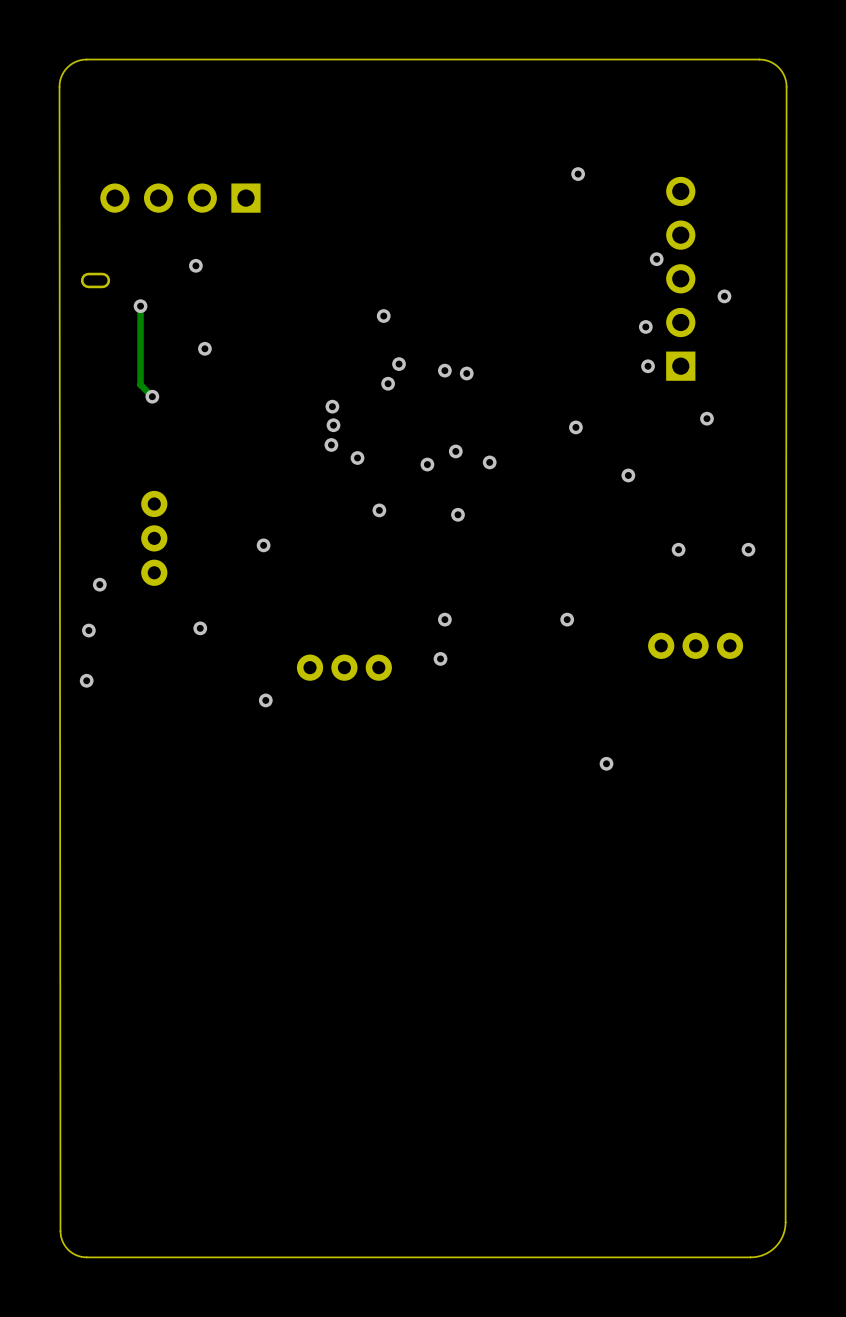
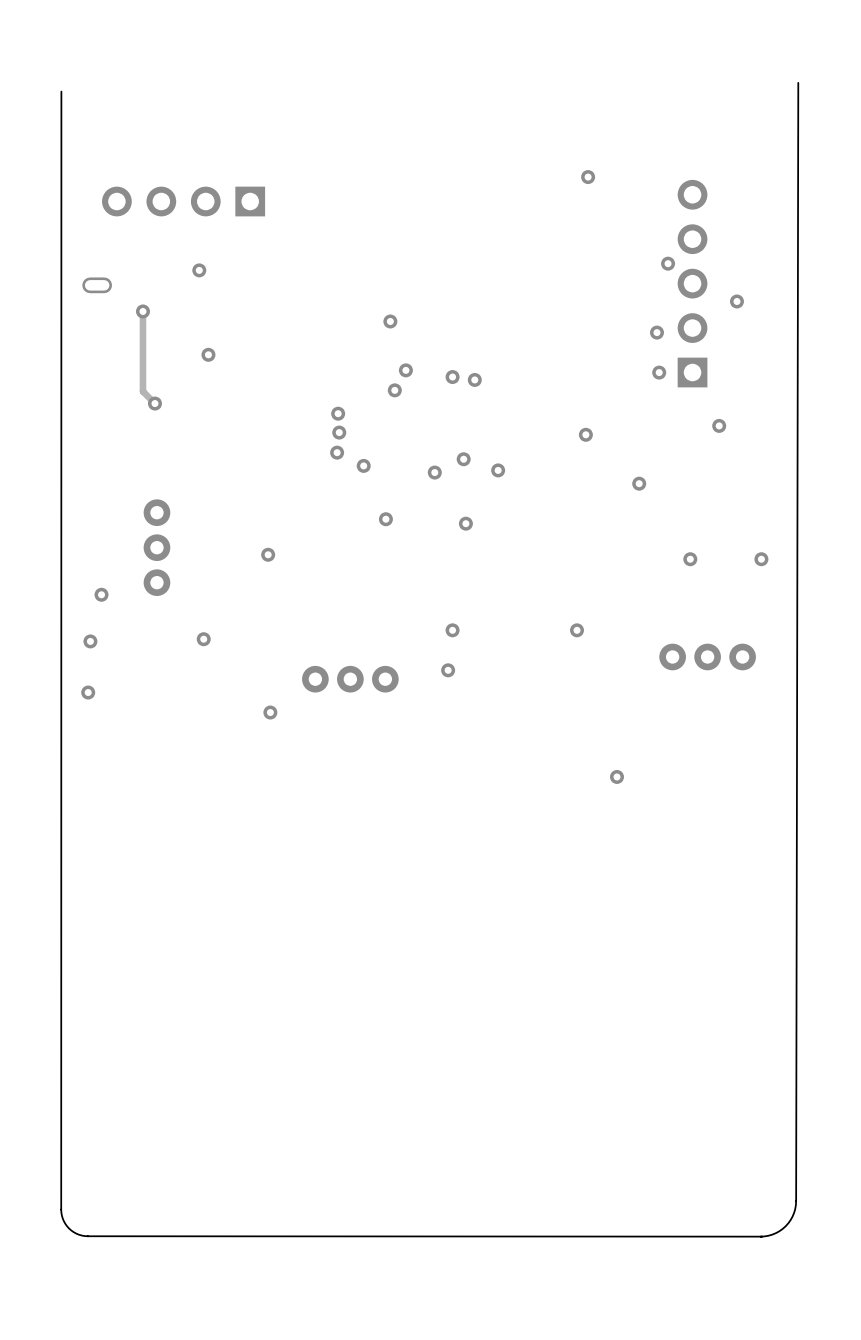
board edge: (759, 59) (86, 59) (74, 62) (63, 72) (59, 86) (60, 1231) (63, 1242) (72, 1253) (86, 1257) (750, 1257) (765, 1253) (780, 1241) (785, 1222) (786, 86) (783, 74) (778, 67) (768, 61) (759, 59) -> none
board edge: none -> (798, 82) (796, 1201) (794, 1212) (785, 1226) (772, 1234) (760, 1236)
board edge: none -> (61, 91) (61, 1209) (65, 1223) (73, 1232) (87, 1236) (762, 1236)

